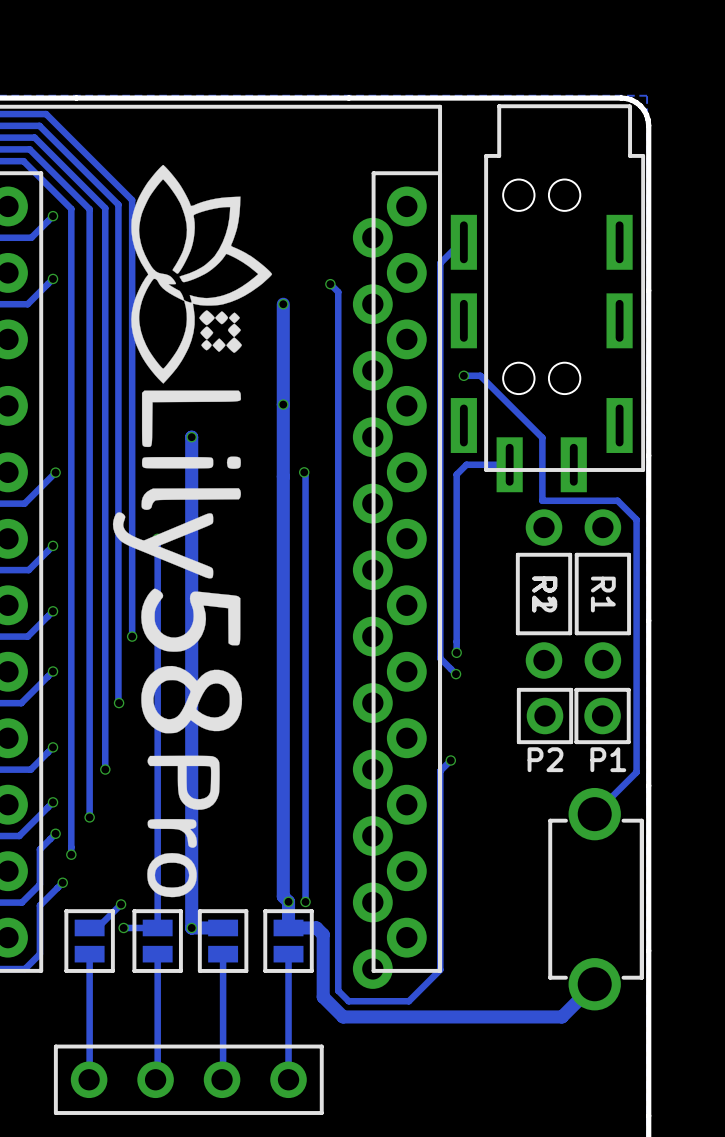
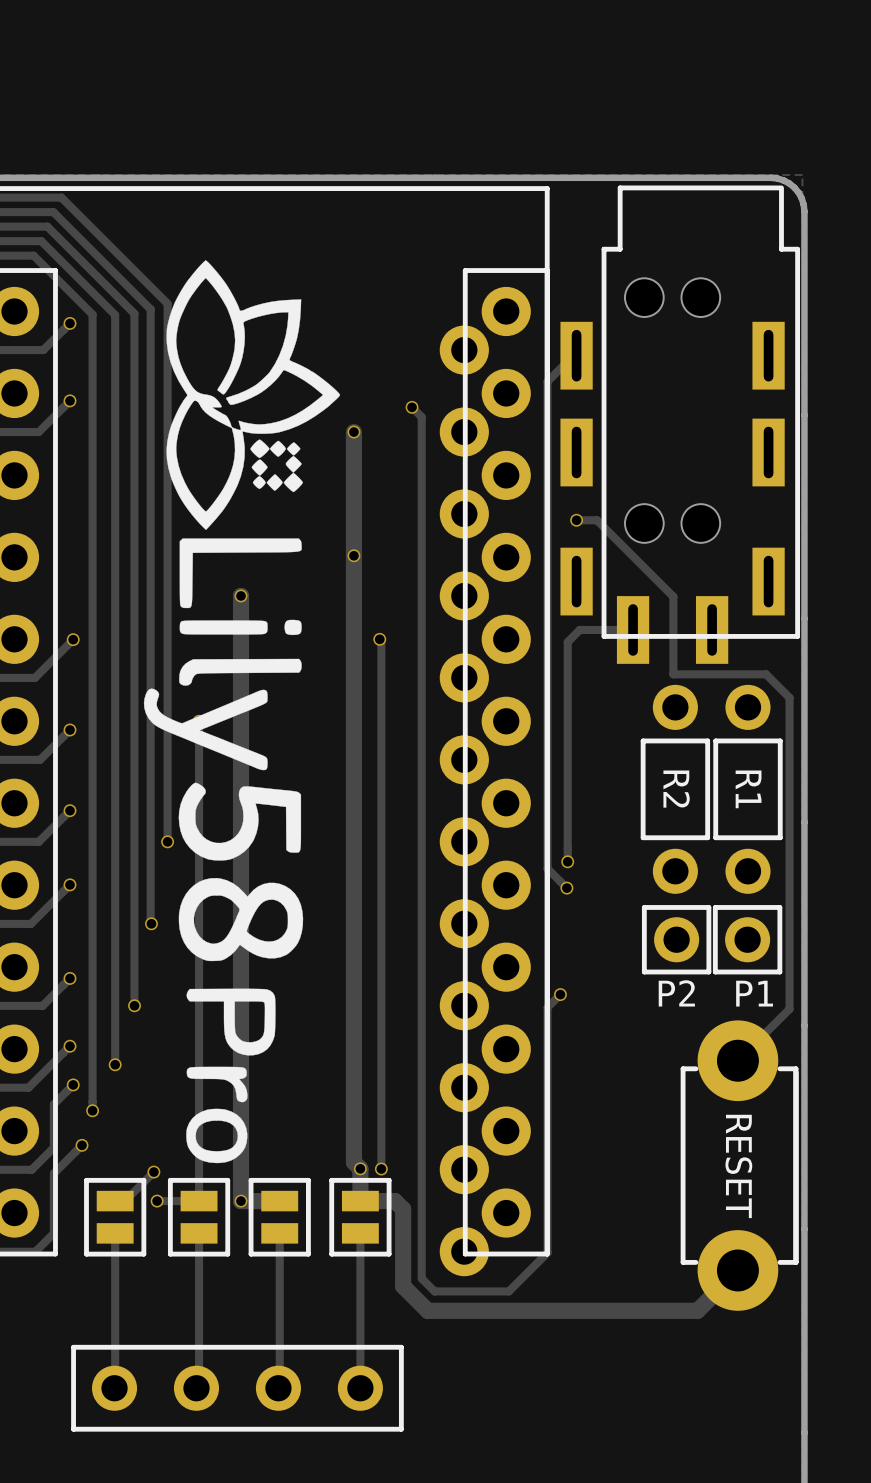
part footprint: [515, 509, 573, 679] -> [640, 684, 711, 894]
part footprint: [548, 787, 644, 1011] -> [680, 1020, 799, 1311]

